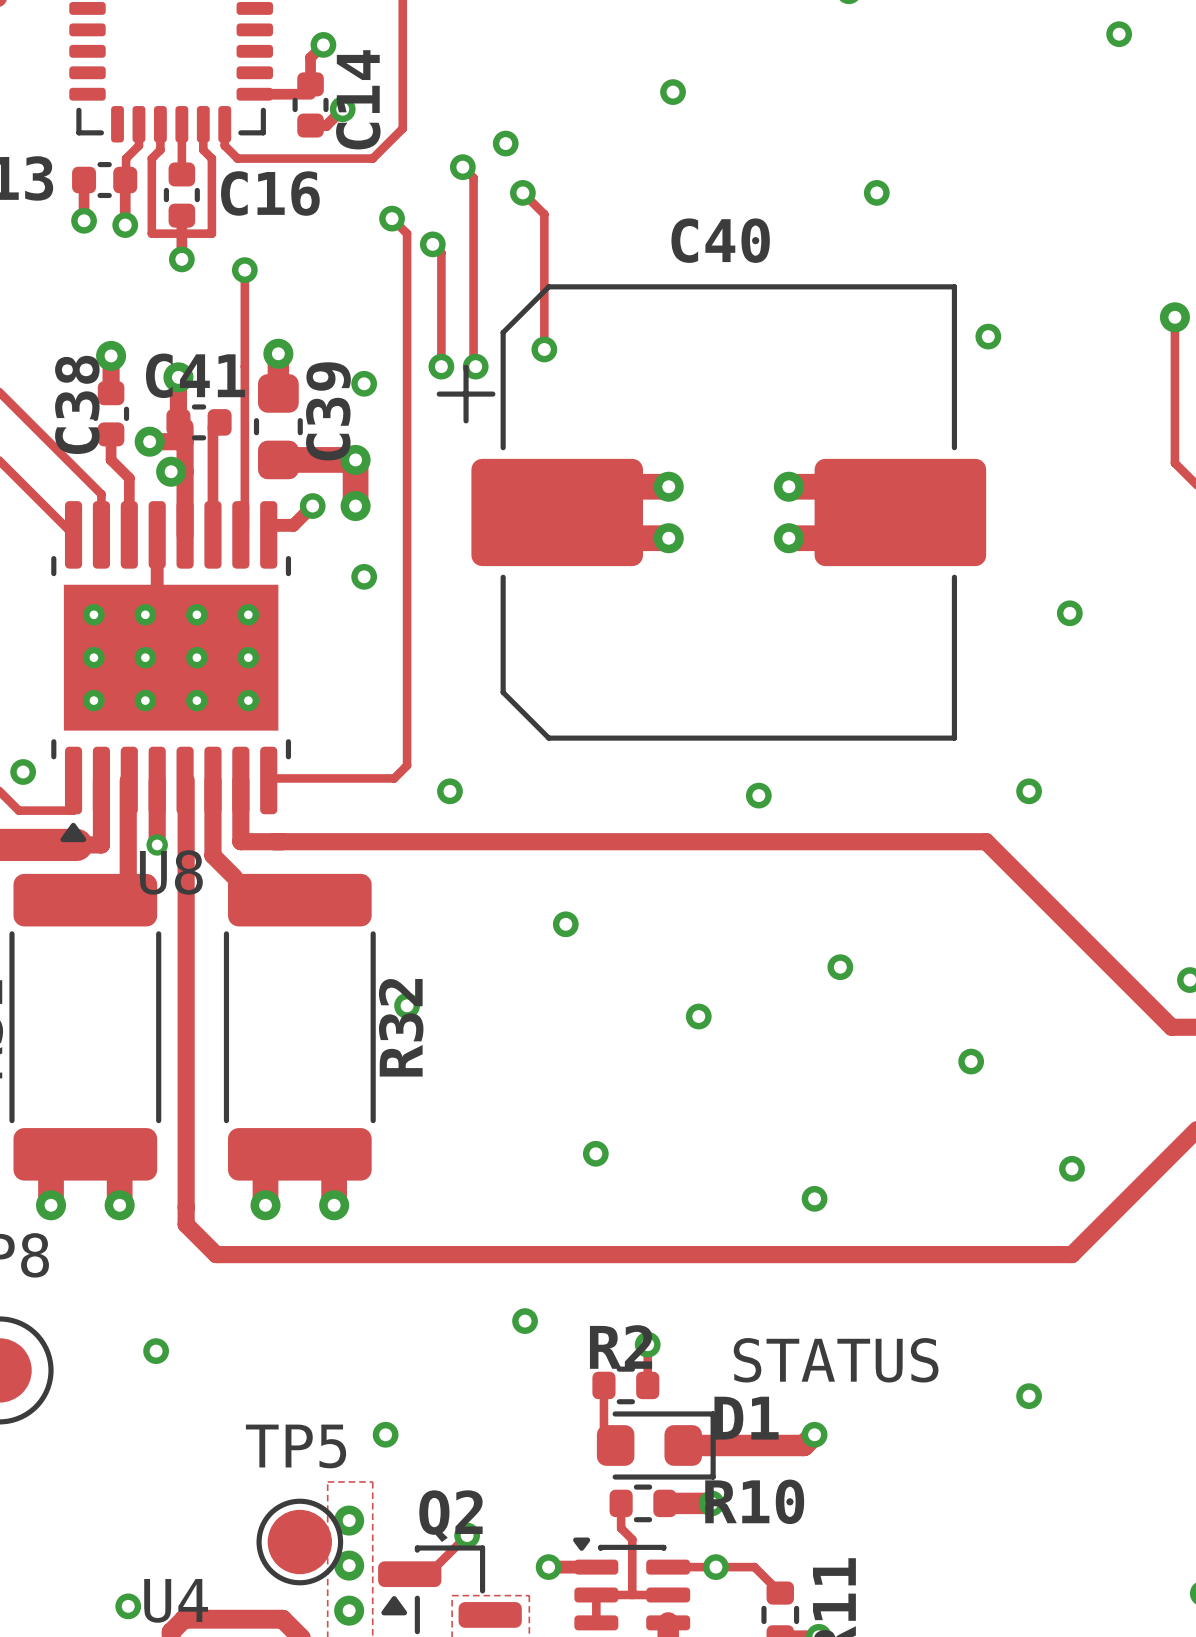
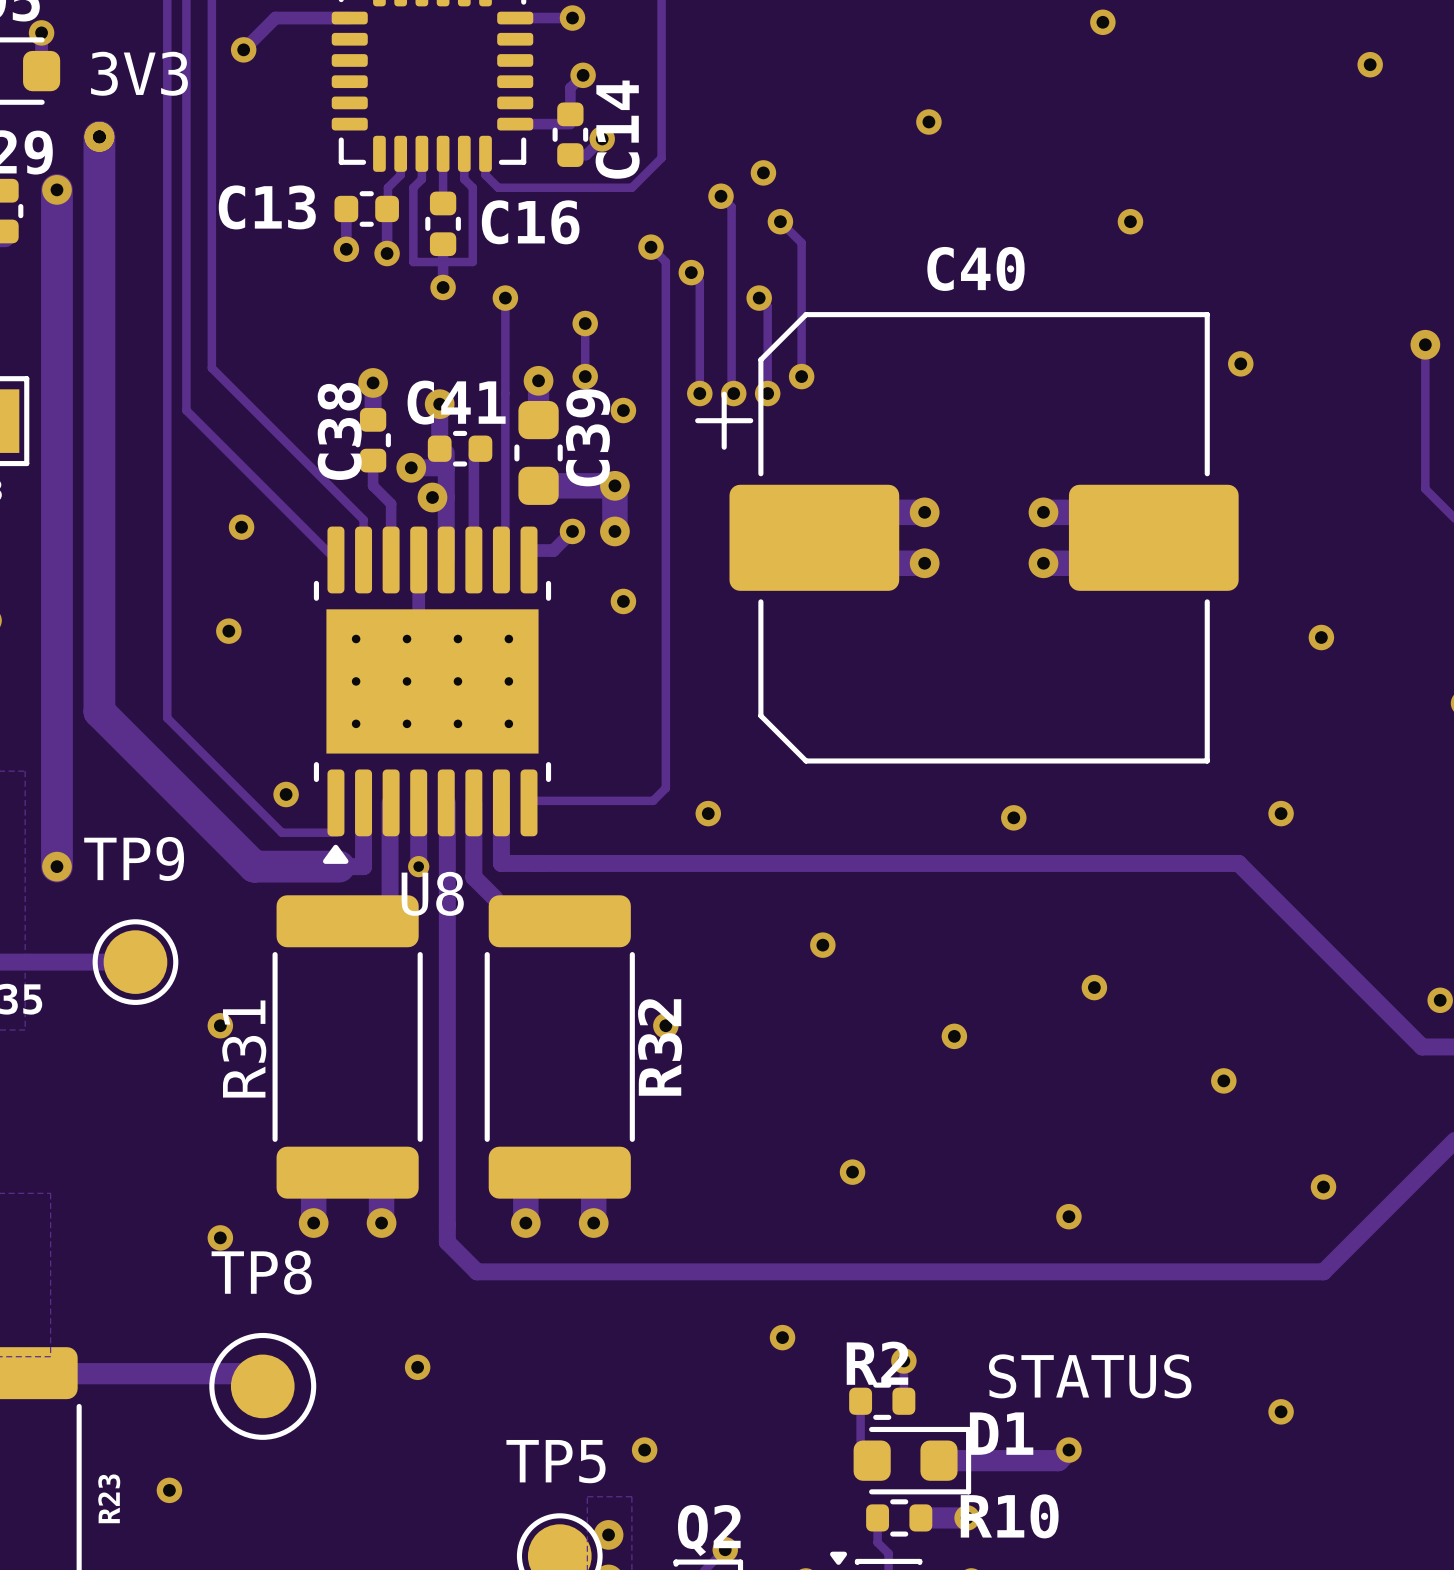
track: none -> (759, 298) (767, 306) (767, 393)
via: none -> (759, 298)
track: none -> (585, 323) (585, 376)
via: none -> (585, 323)
via: none -> (585, 376)
via: none -> (767, 393)

